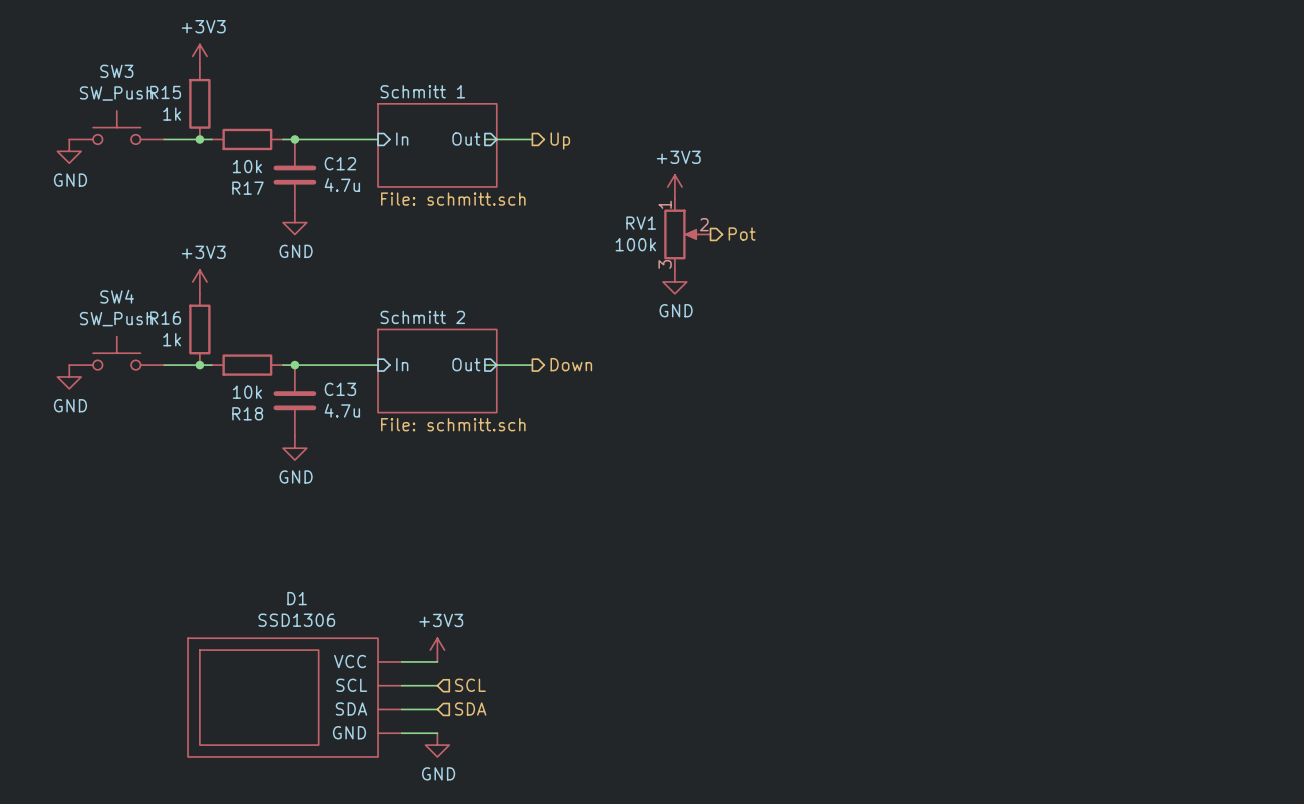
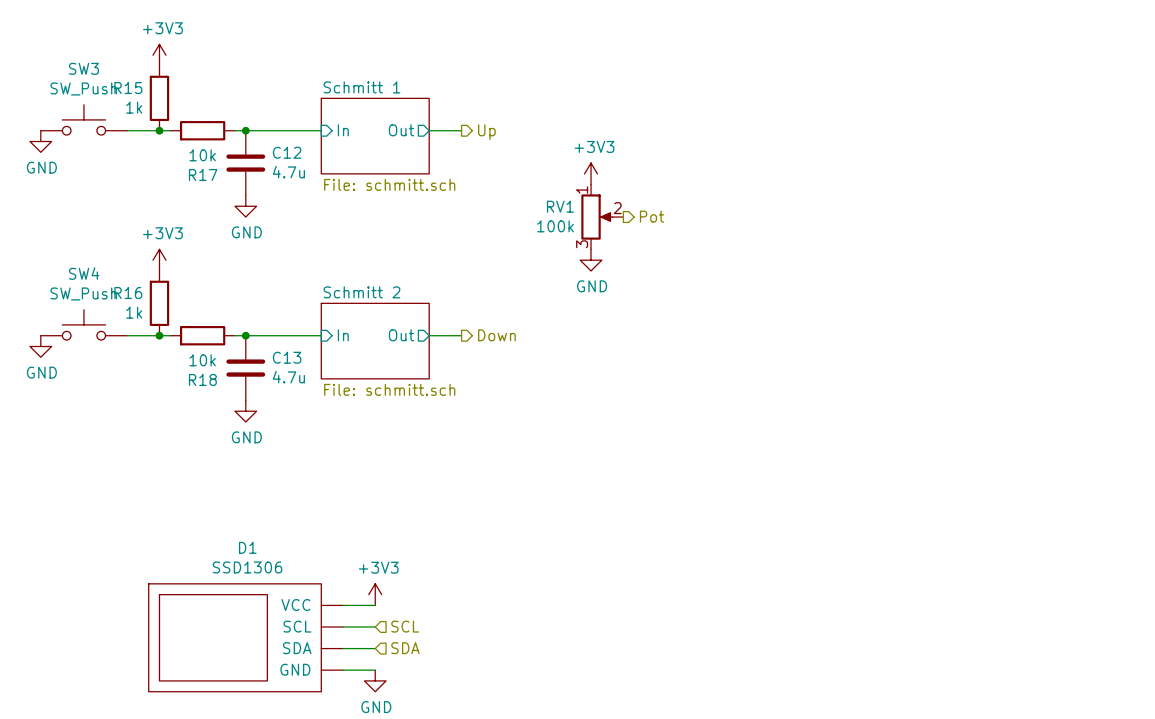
wire: (484, 139) (496, 139) -> none
wire: (484, 365) (496, 365) -> none

